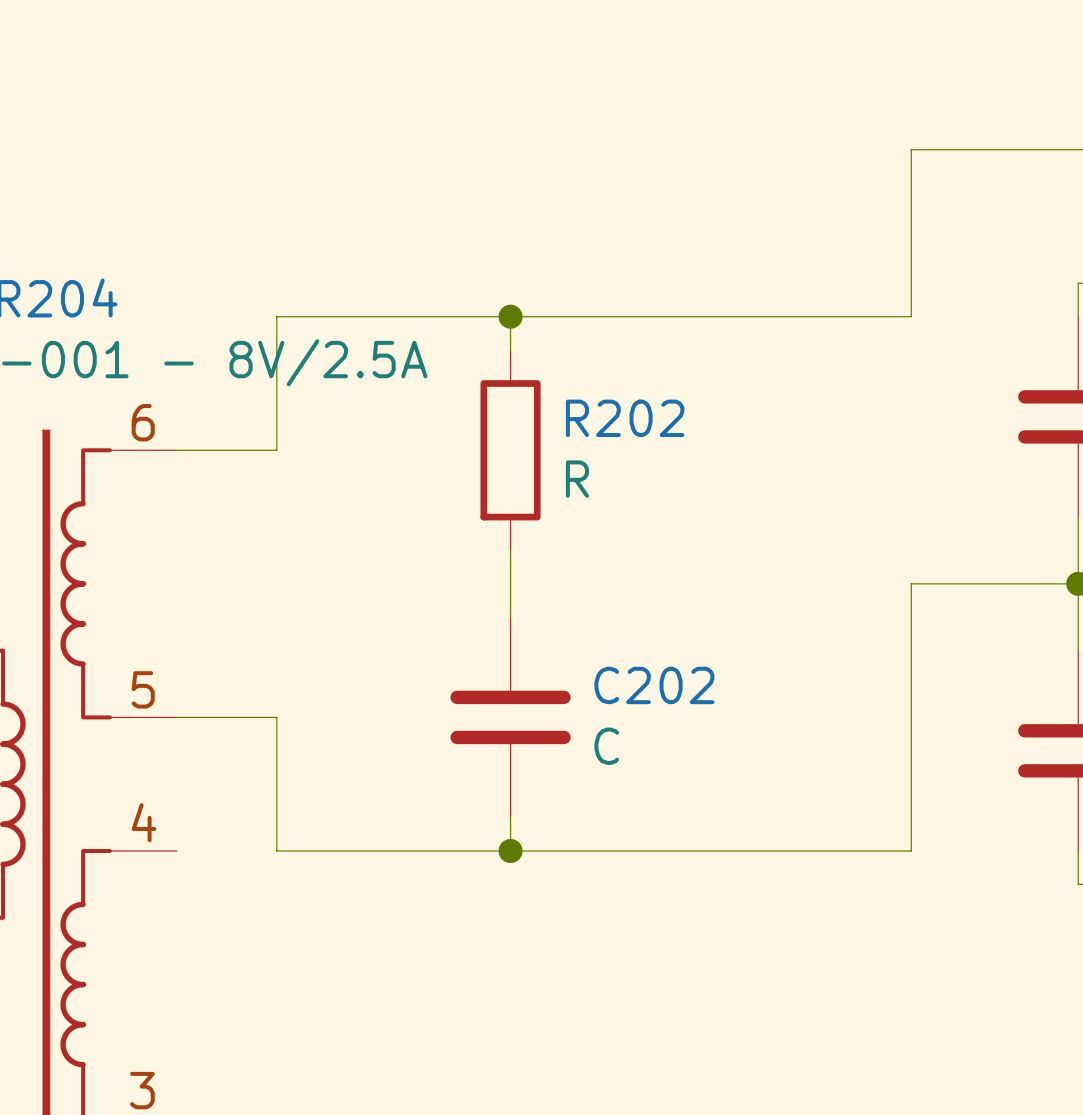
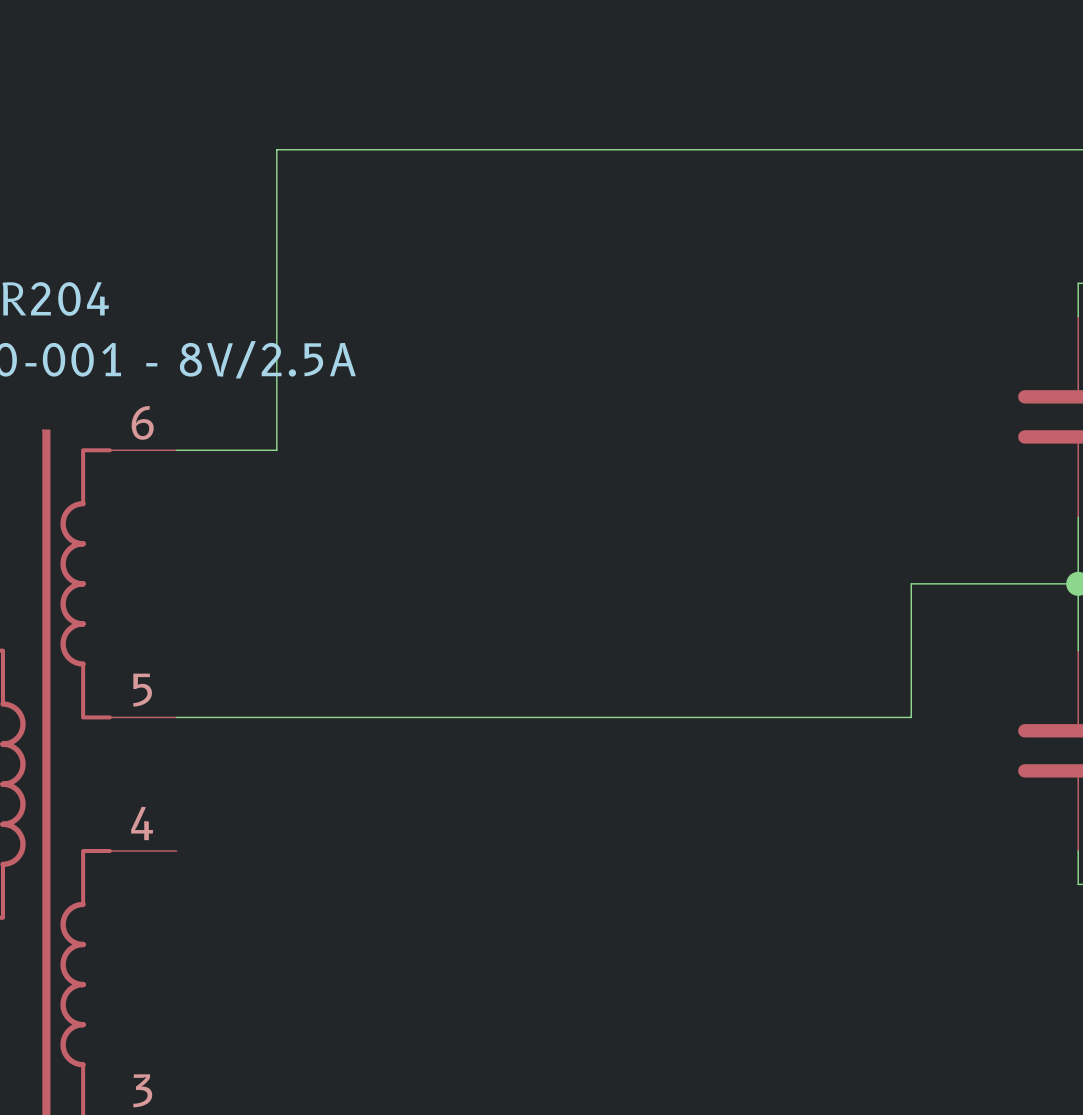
wire: (911, 149) (911, 316) (276, 316) -> (911, 149) (276, 149) (276, 316)
wire: (510, 316) (510, 350) -> none
junction: (510, 316) -> none
R202: R (510, 450) -> none
wire: (510, 550) (510, 617) -> none
wire: (276, 717) (276, 851) (911, 851) (911, 717) -> (276, 717) (911, 717)
C202: C (510, 717) -> none
wire: (510, 817) (510, 851) -> none
junction: (510, 851) -> none

